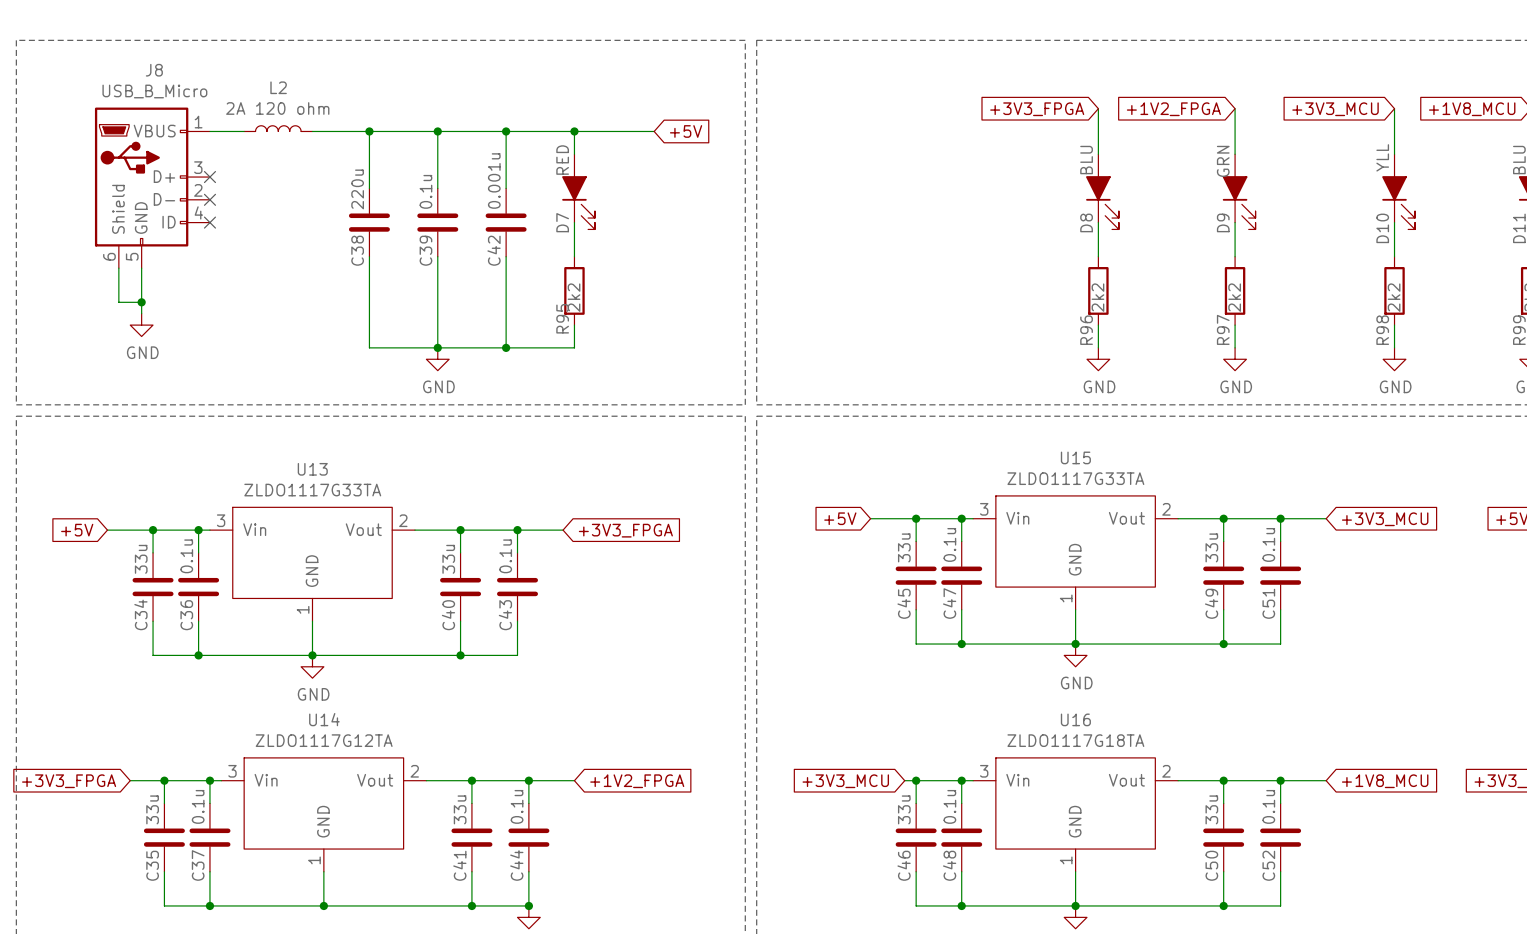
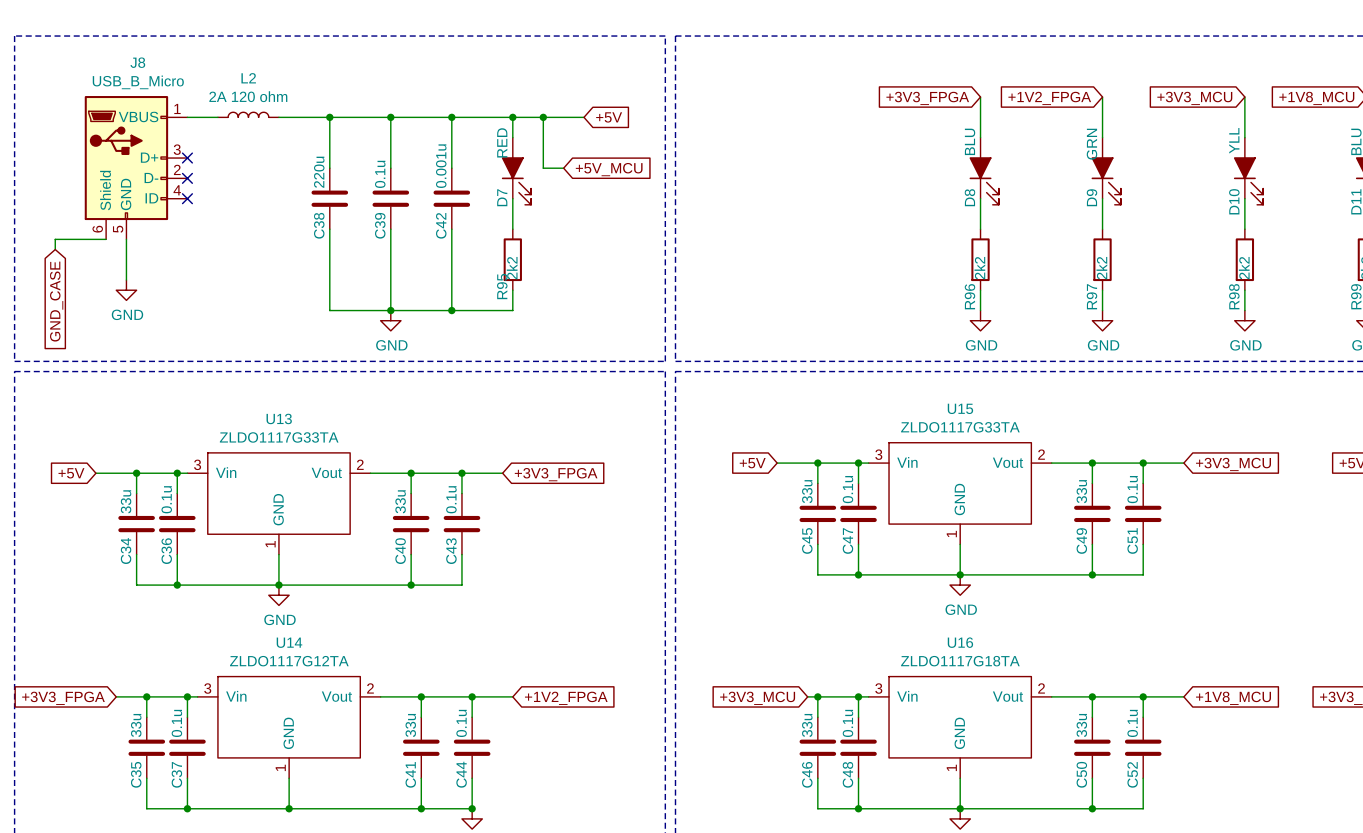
wire: none -> (543, 117) (543, 168) (563, 168)
junction: none -> (543, 117)
global label: none -> +5V_MCU (609, 169)
wire: (118, 268) (118, 302) (141, 302) -> (106, 239) (55, 239) (55, 249)
junction: (141, 302) -> none
global label: none -> GND_CASE (56, 301)

